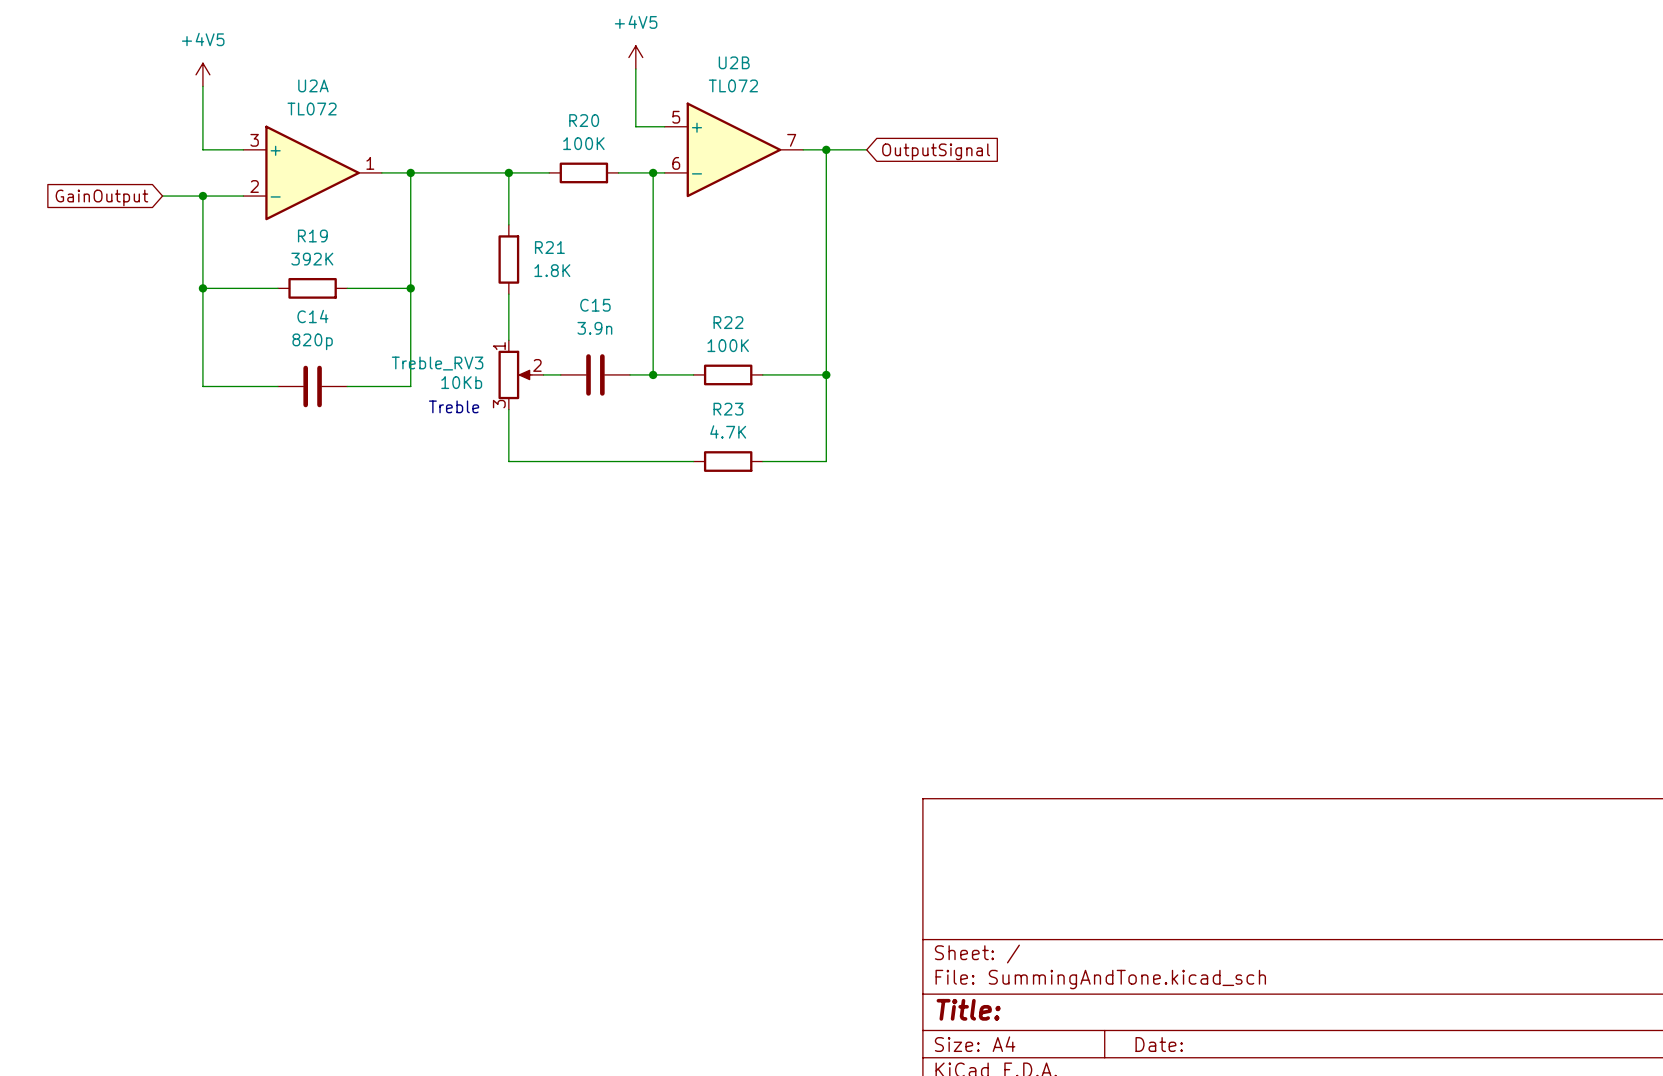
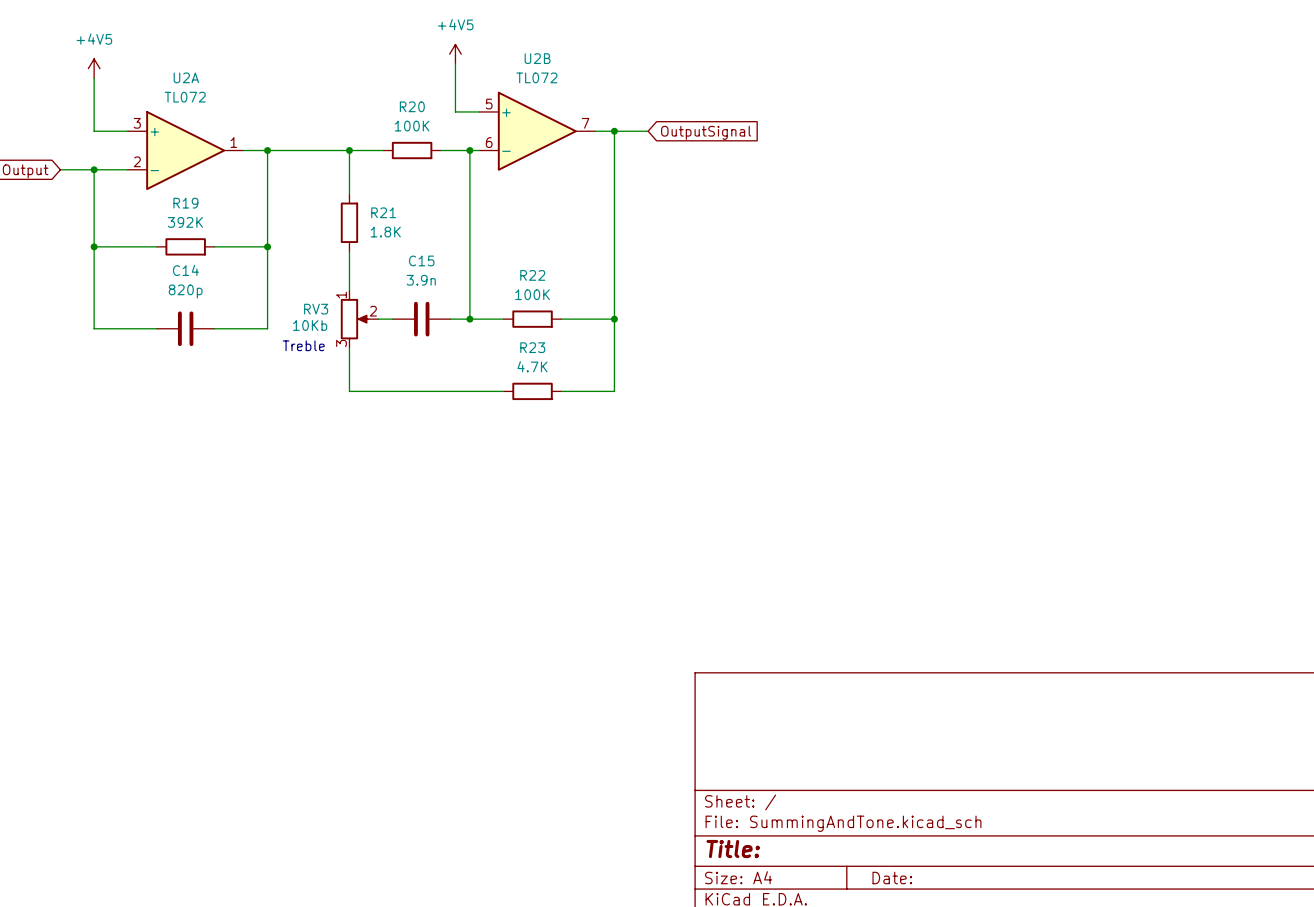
Treble_RV3 name: Treble_RV3 (437, 363) -> RV3 (316, 309)

